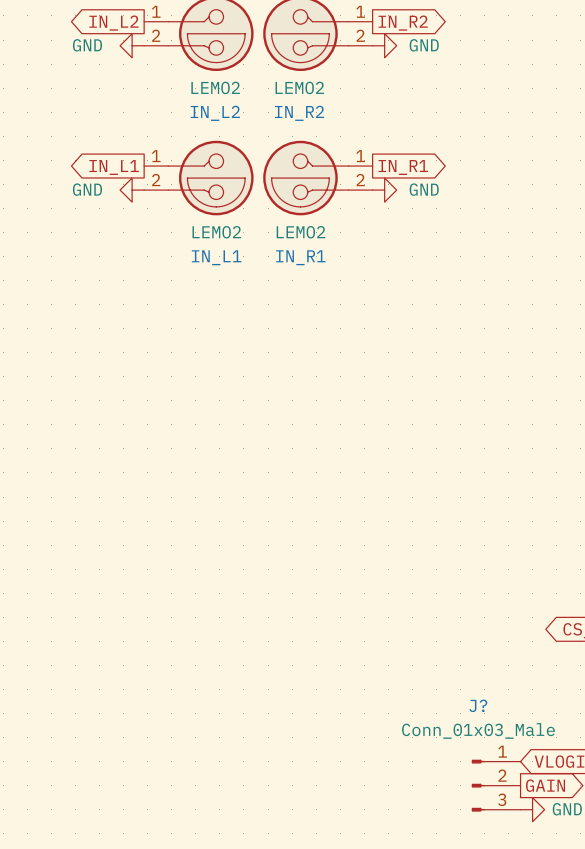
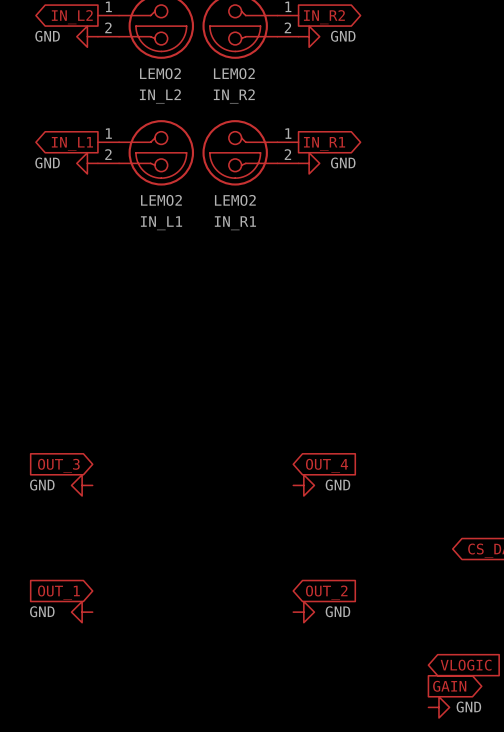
global label: none -> OUT_3 (58, 465)
global label: none -> OUT_4 (327, 465)
power symbol: none -> GND (82, 485)
power symbol: none -> GND (303, 485)
global label: none -> OUT_1 (58, 592)
global label: none -> OUT_2 (326, 592)
power symbol: none -> GND (82, 612)
power symbol: none -> GND (303, 612)
J?: Conn_01x03_Male (496, 785) -> none

